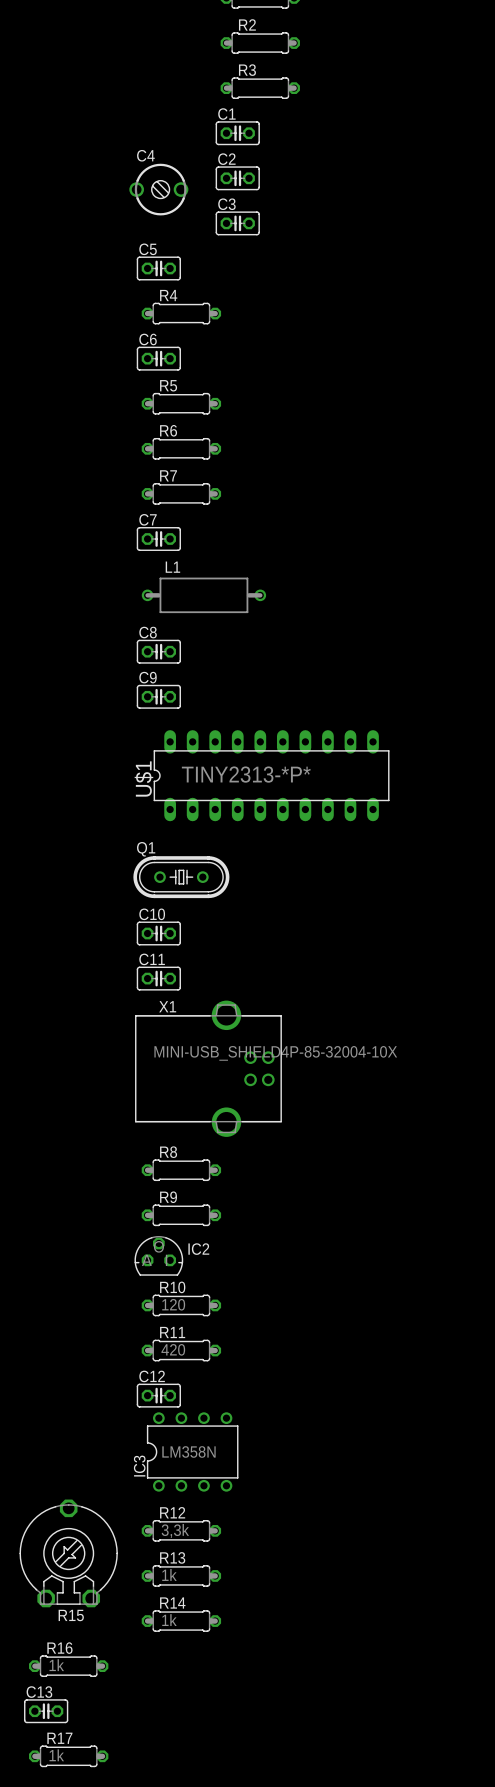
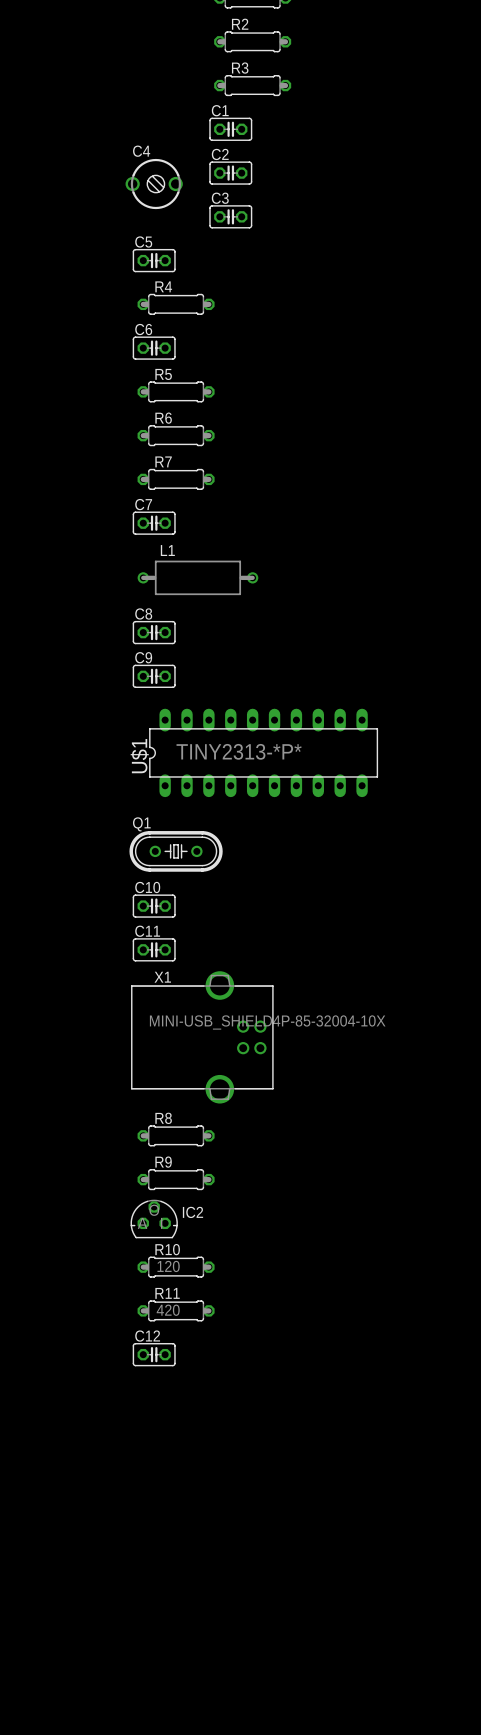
IC3: LM358N (192, 1451) -> none
R12: 3,3k (181, 1530) -> none
R15: (68, 1553) -> none
R13: 1k (181, 1575) -> none
R14: 1k (181, 1621) -> none
R16: 1k (68, 1666) -> none
C13: (46, 1711) -> none
R17: 1k (68, 1756) -> none

